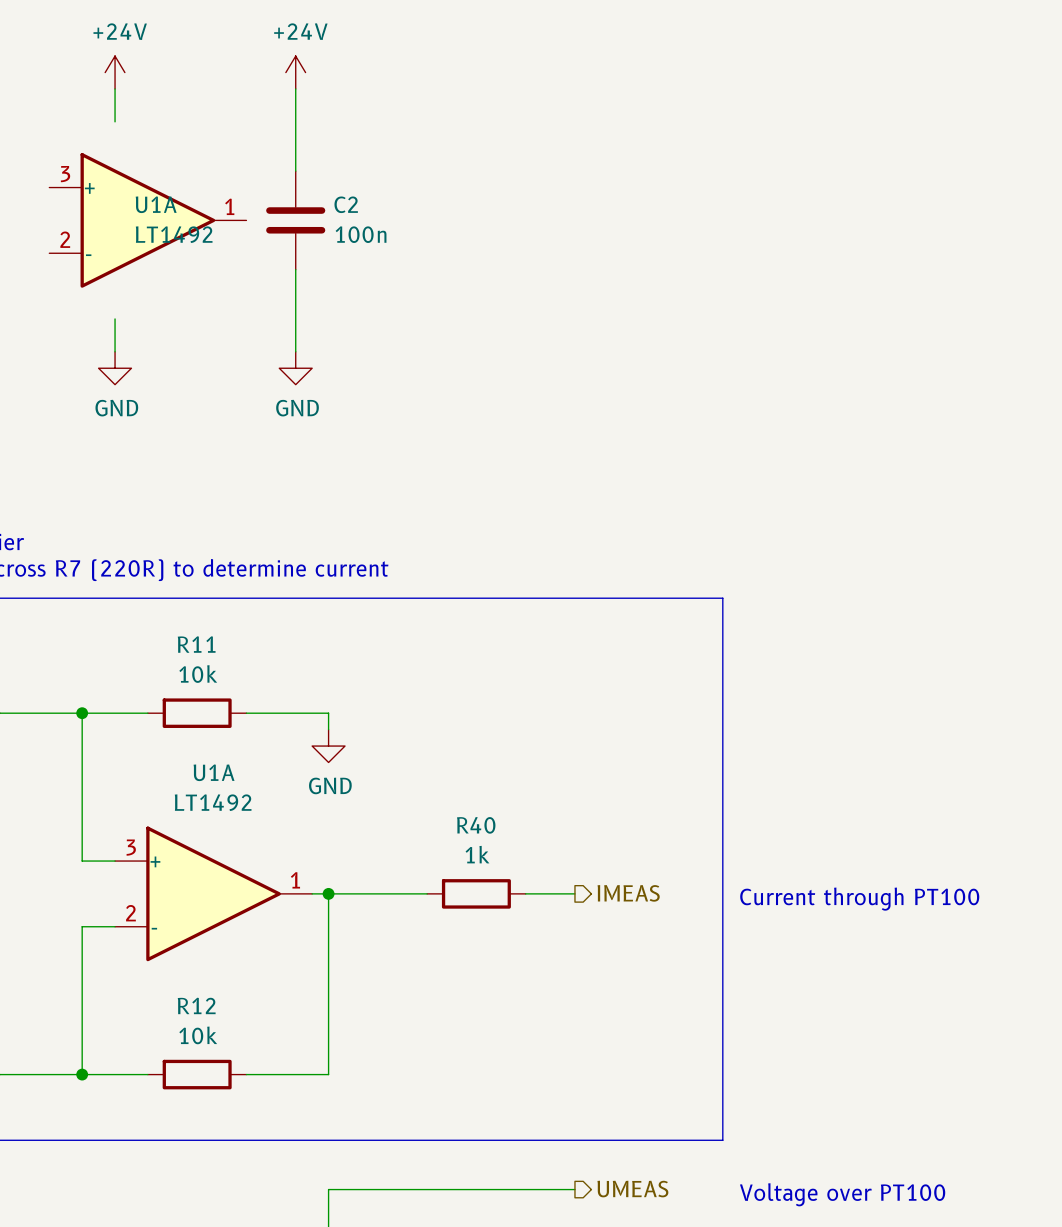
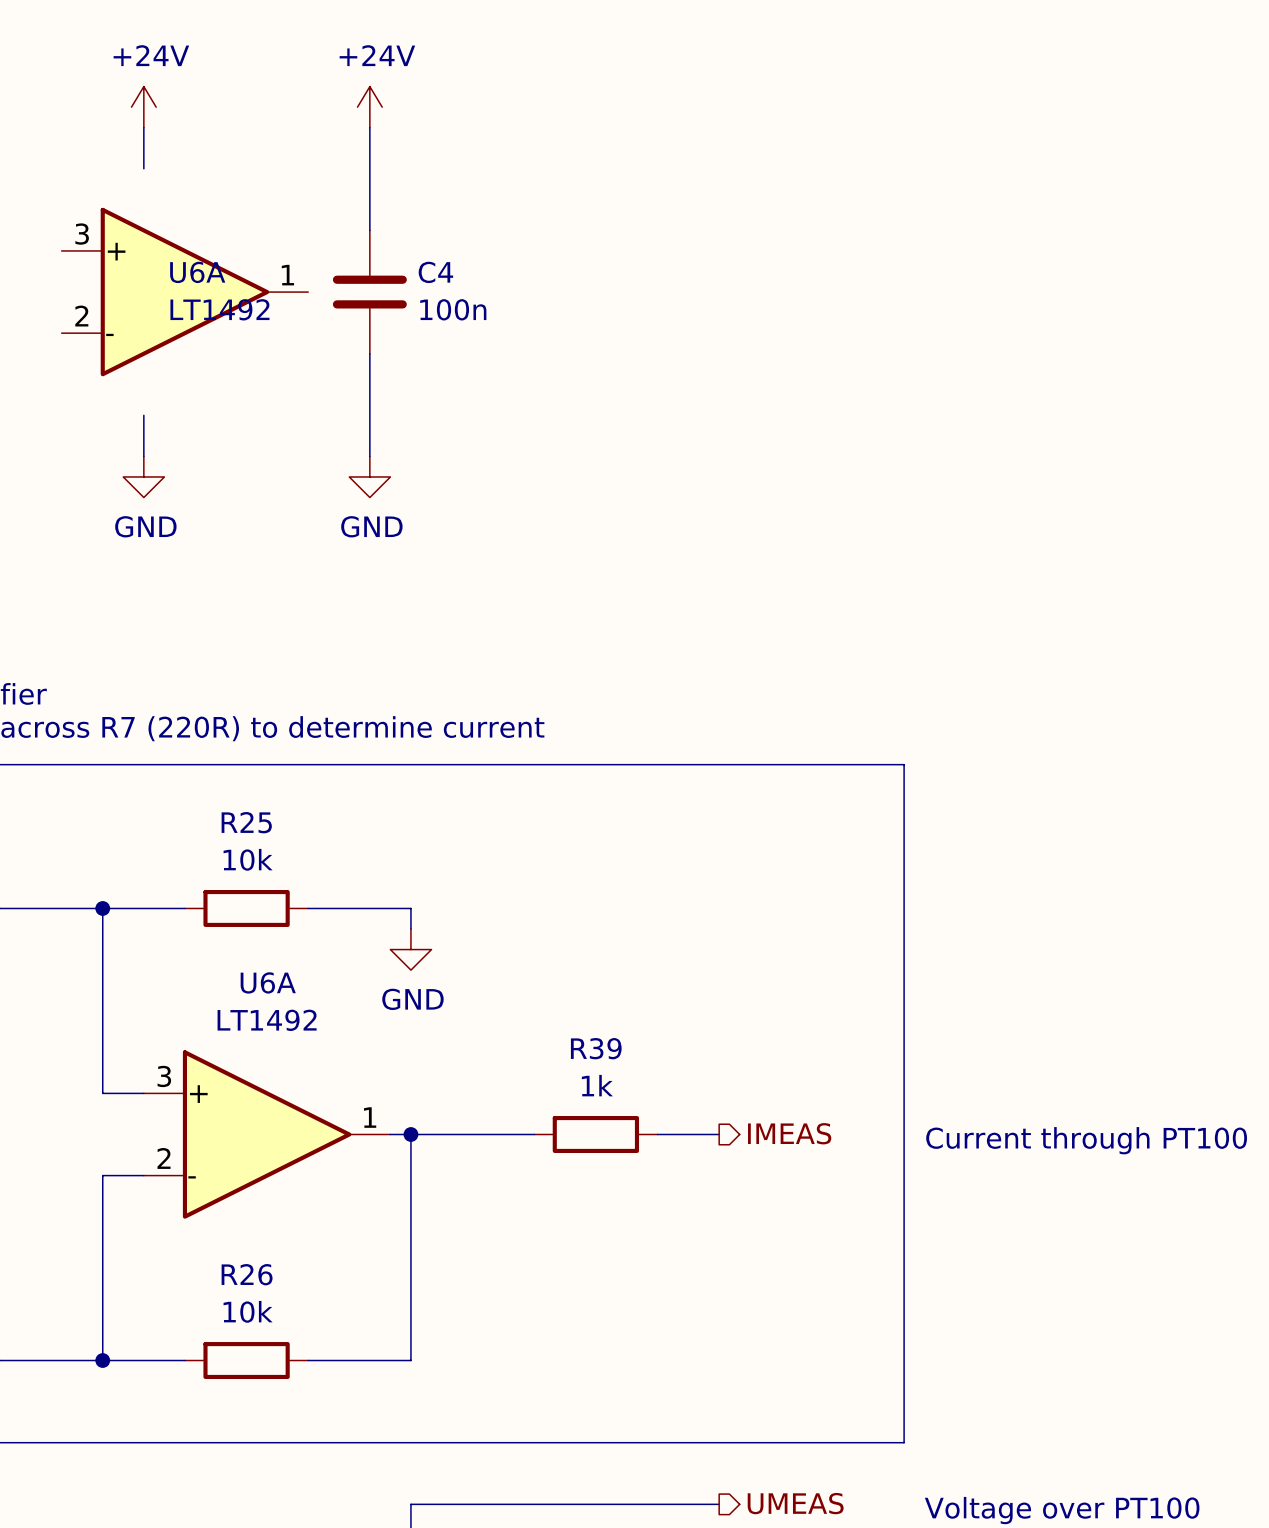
U1A name: U1A (156, 204) -> U6A (197, 272)
C2 name: C2 (346, 204) -> C4 (435, 272)
R11 name: R11 (196, 644) -> R25 (246, 822)
U1A name: U1A (214, 772) -> U6A (268, 982)
R40 name: R40 (476, 825) -> R39 (596, 1048)
R12 name: R12 (196, 1005) -> R26 (247, 1274)

